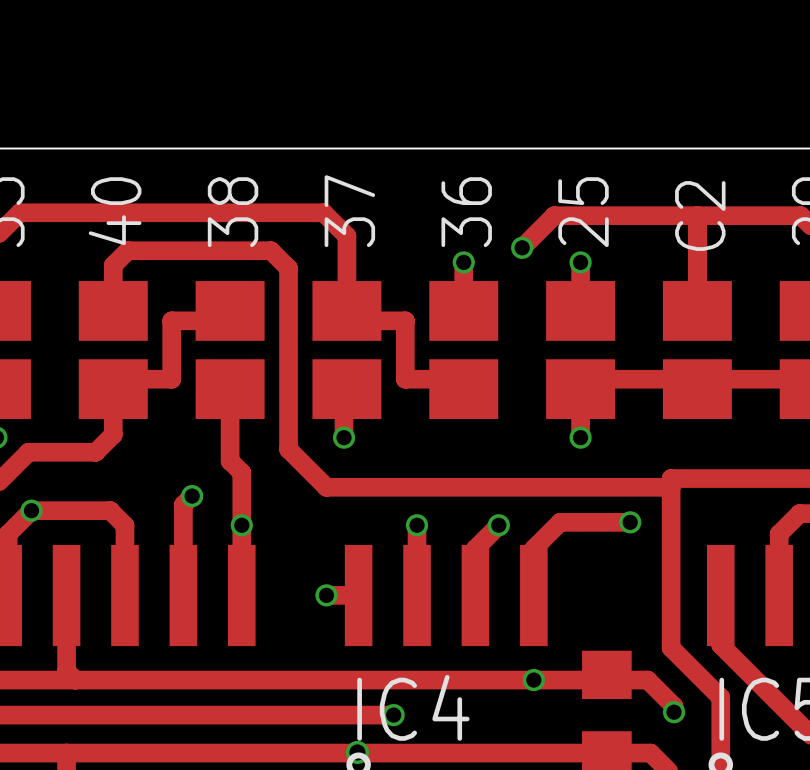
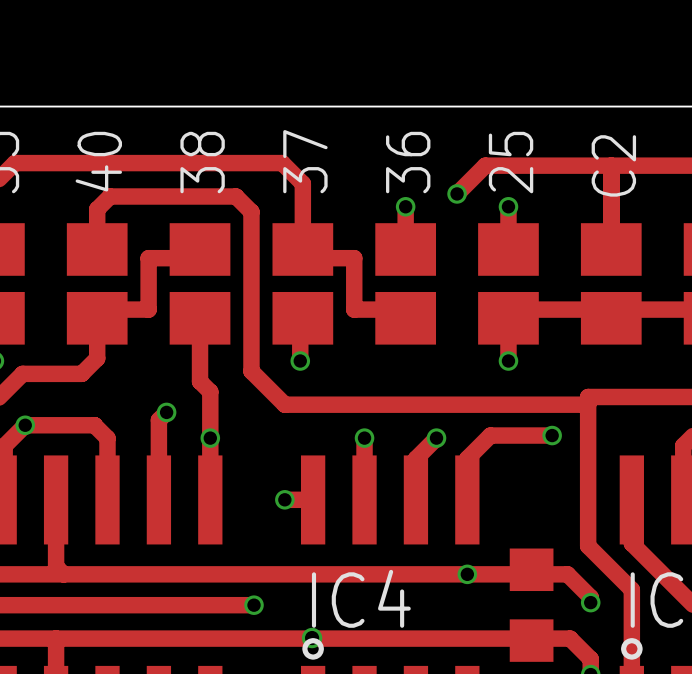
track: (291, 715) (393, 715) -> none
via position: (393, 715) -> (254, 605)

